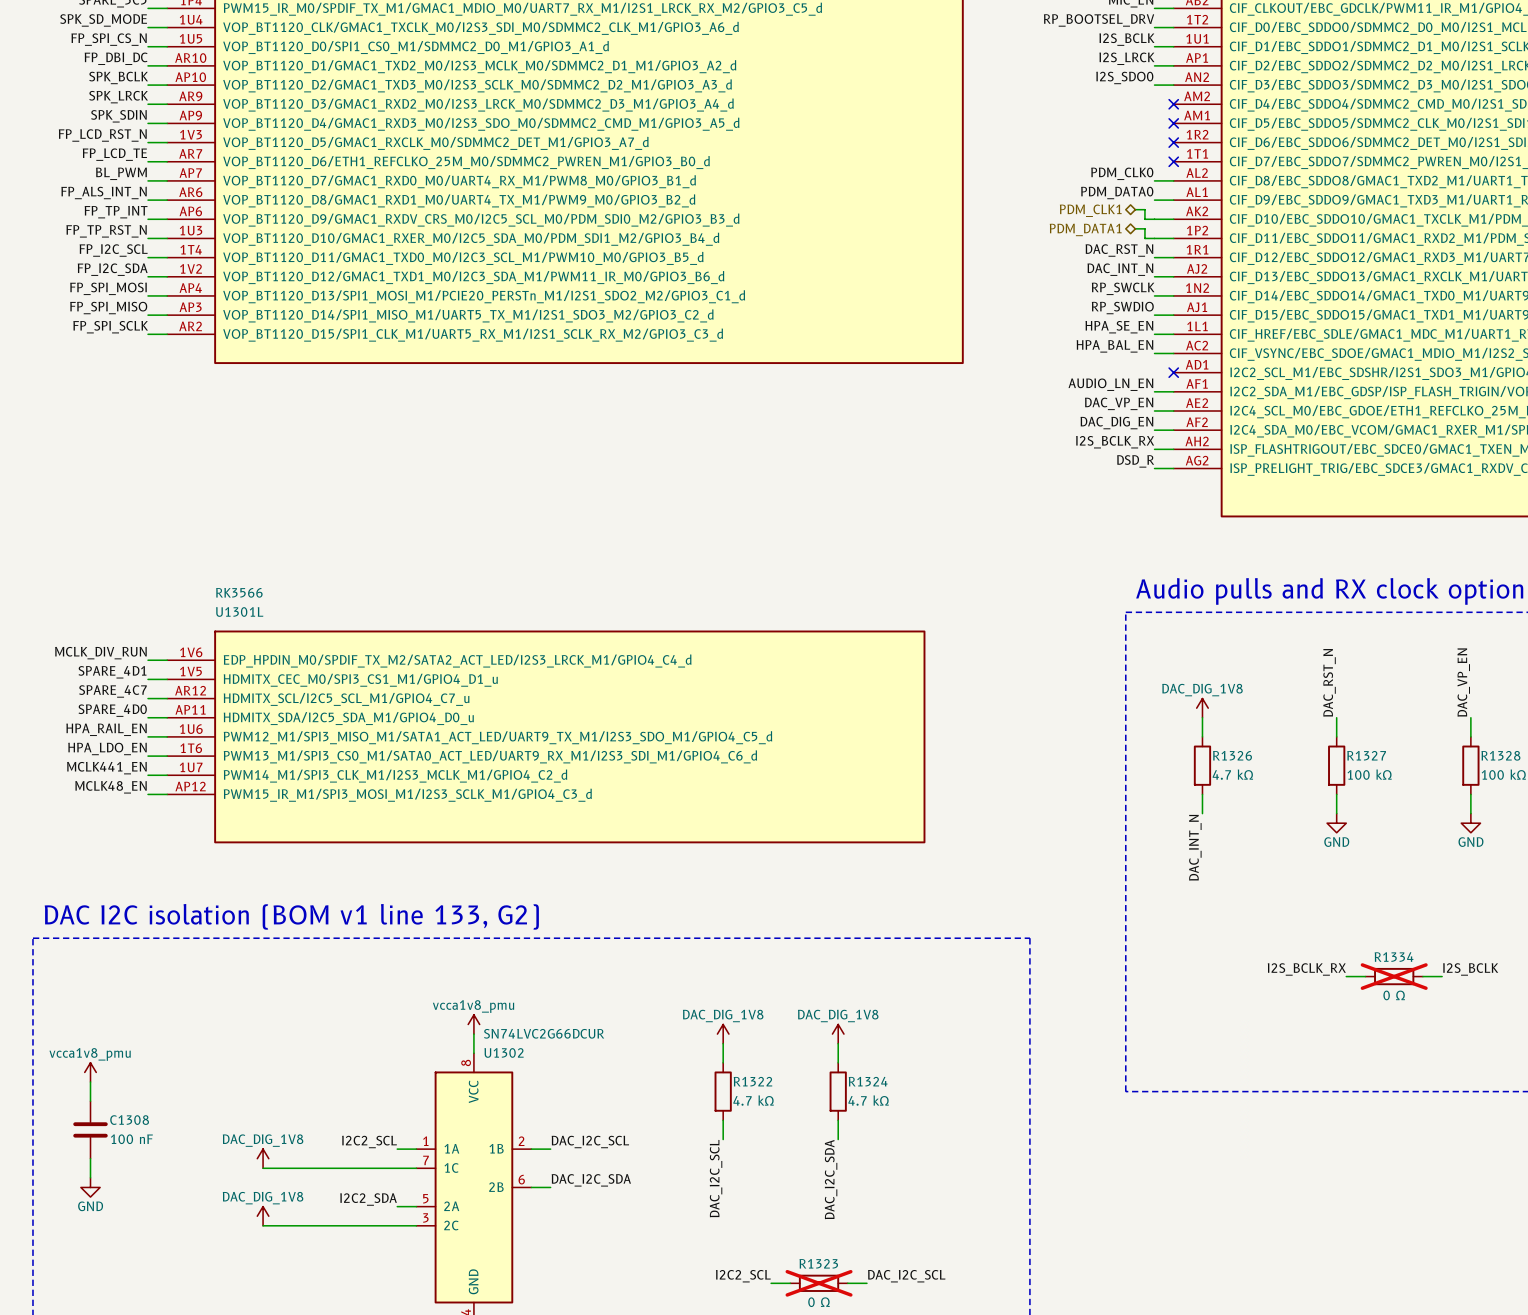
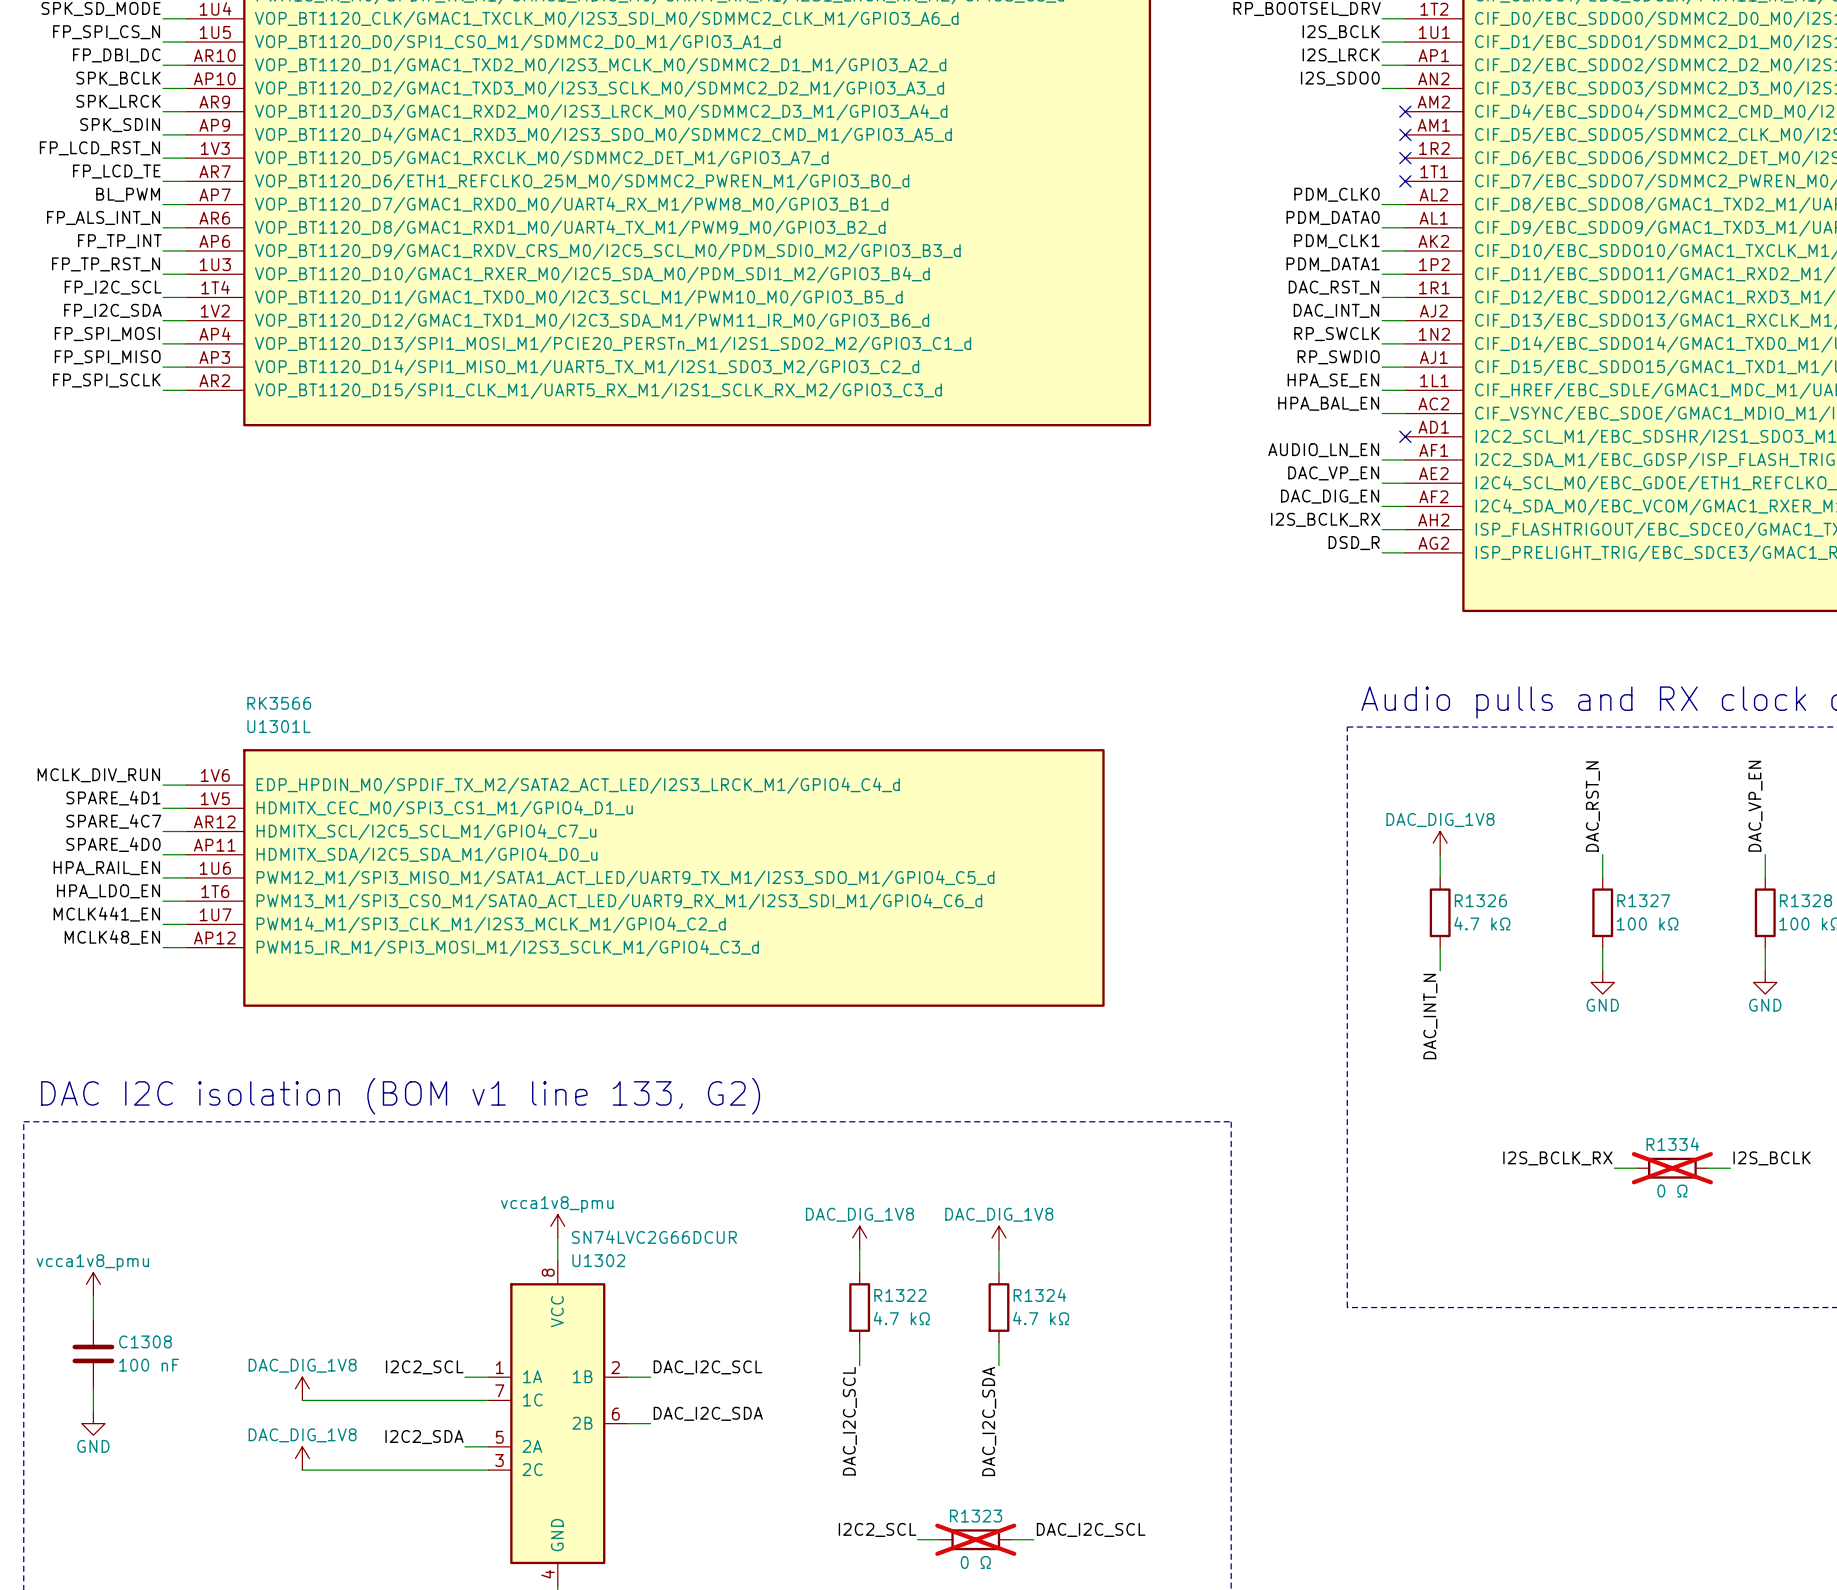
wire: (1135, 209) (1144, 209) (1144, 219) (1154, 219) -> none
hierarchical label: PDM_CLK1 (1090, 210) -> none
label: none -> PDM_CLK1 (1336, 241)
wire: (1135, 228) (1144, 228) (1144, 238) (1154, 238) -> none
hierarchical label: PDM_DATA1 (1085, 229) -> none
label: none -> PDM_DATA1 (1333, 264)

